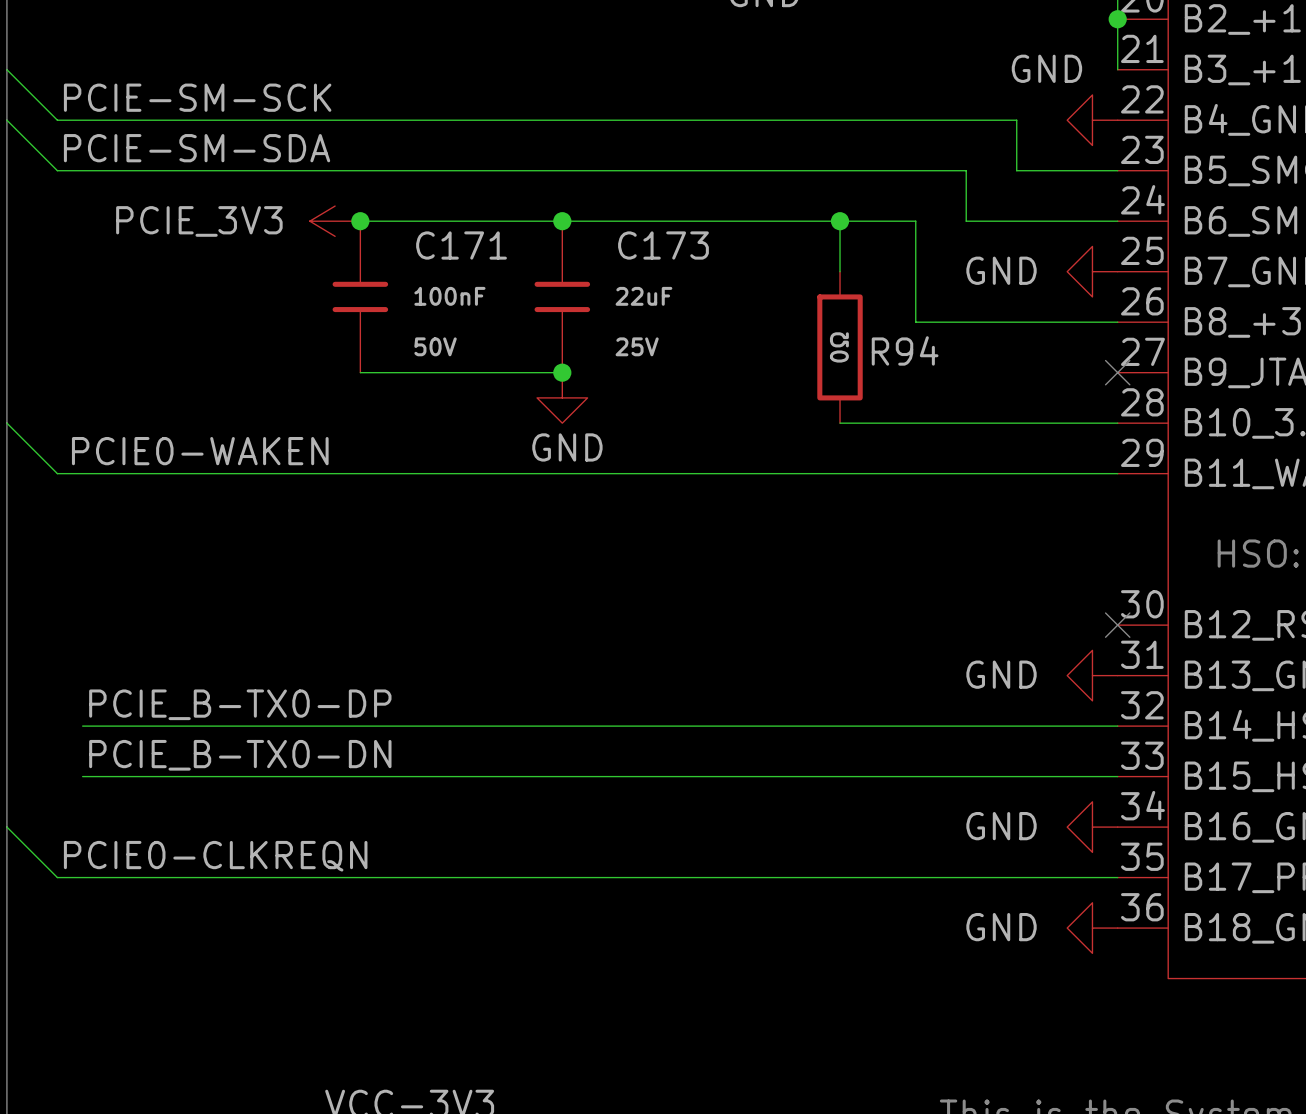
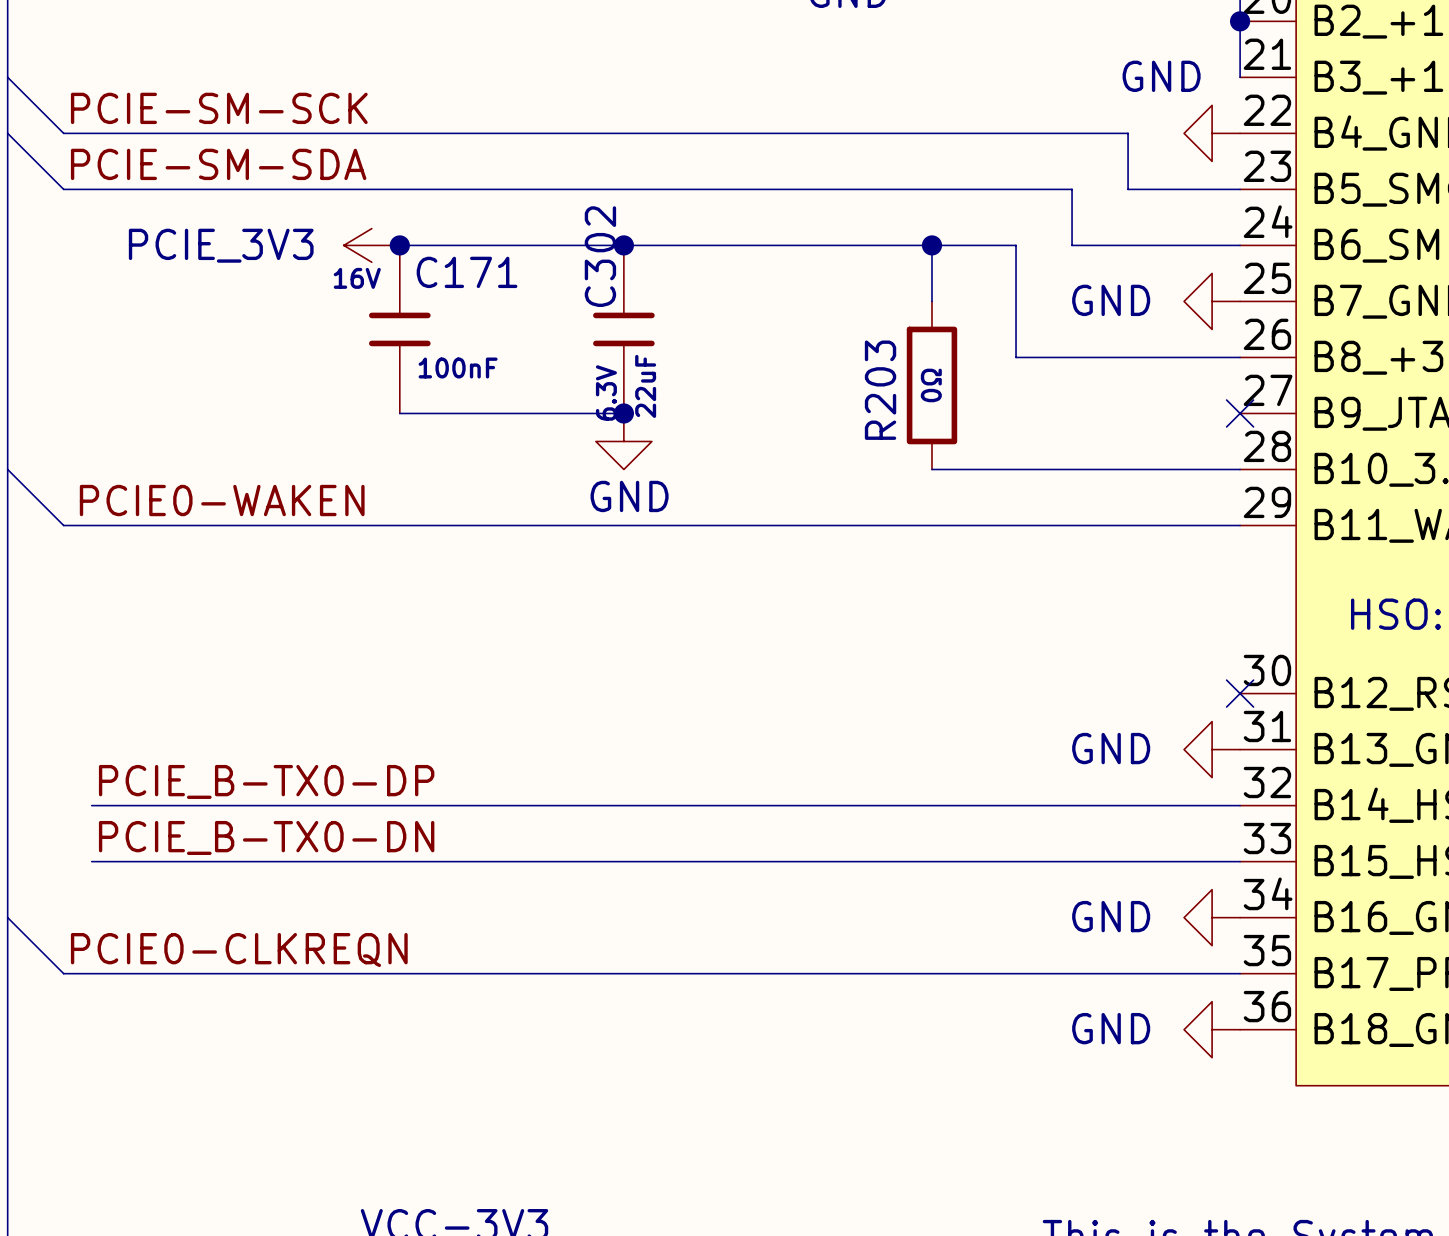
C171 name position: C171 (461, 245) -> C171 (467, 272)
C173 name: C173 (663, 245) -> C302 (600, 256)
C171 value position: 100nF (449, 296) -> 100nF (458, 368)
C173 value rotation: 0° (643, 296) -> 90° counterclockwise (645, 386)
C173 value position: 22uF (643, 296) -> 22uF (645, 386)
C171 text: 50V (435, 346) -> 16V (357, 278)
C173 text: 25V (637, 346) -> 6.3V (606, 393)
R94 name: R94 (905, 350) -> R203 (880, 390)

